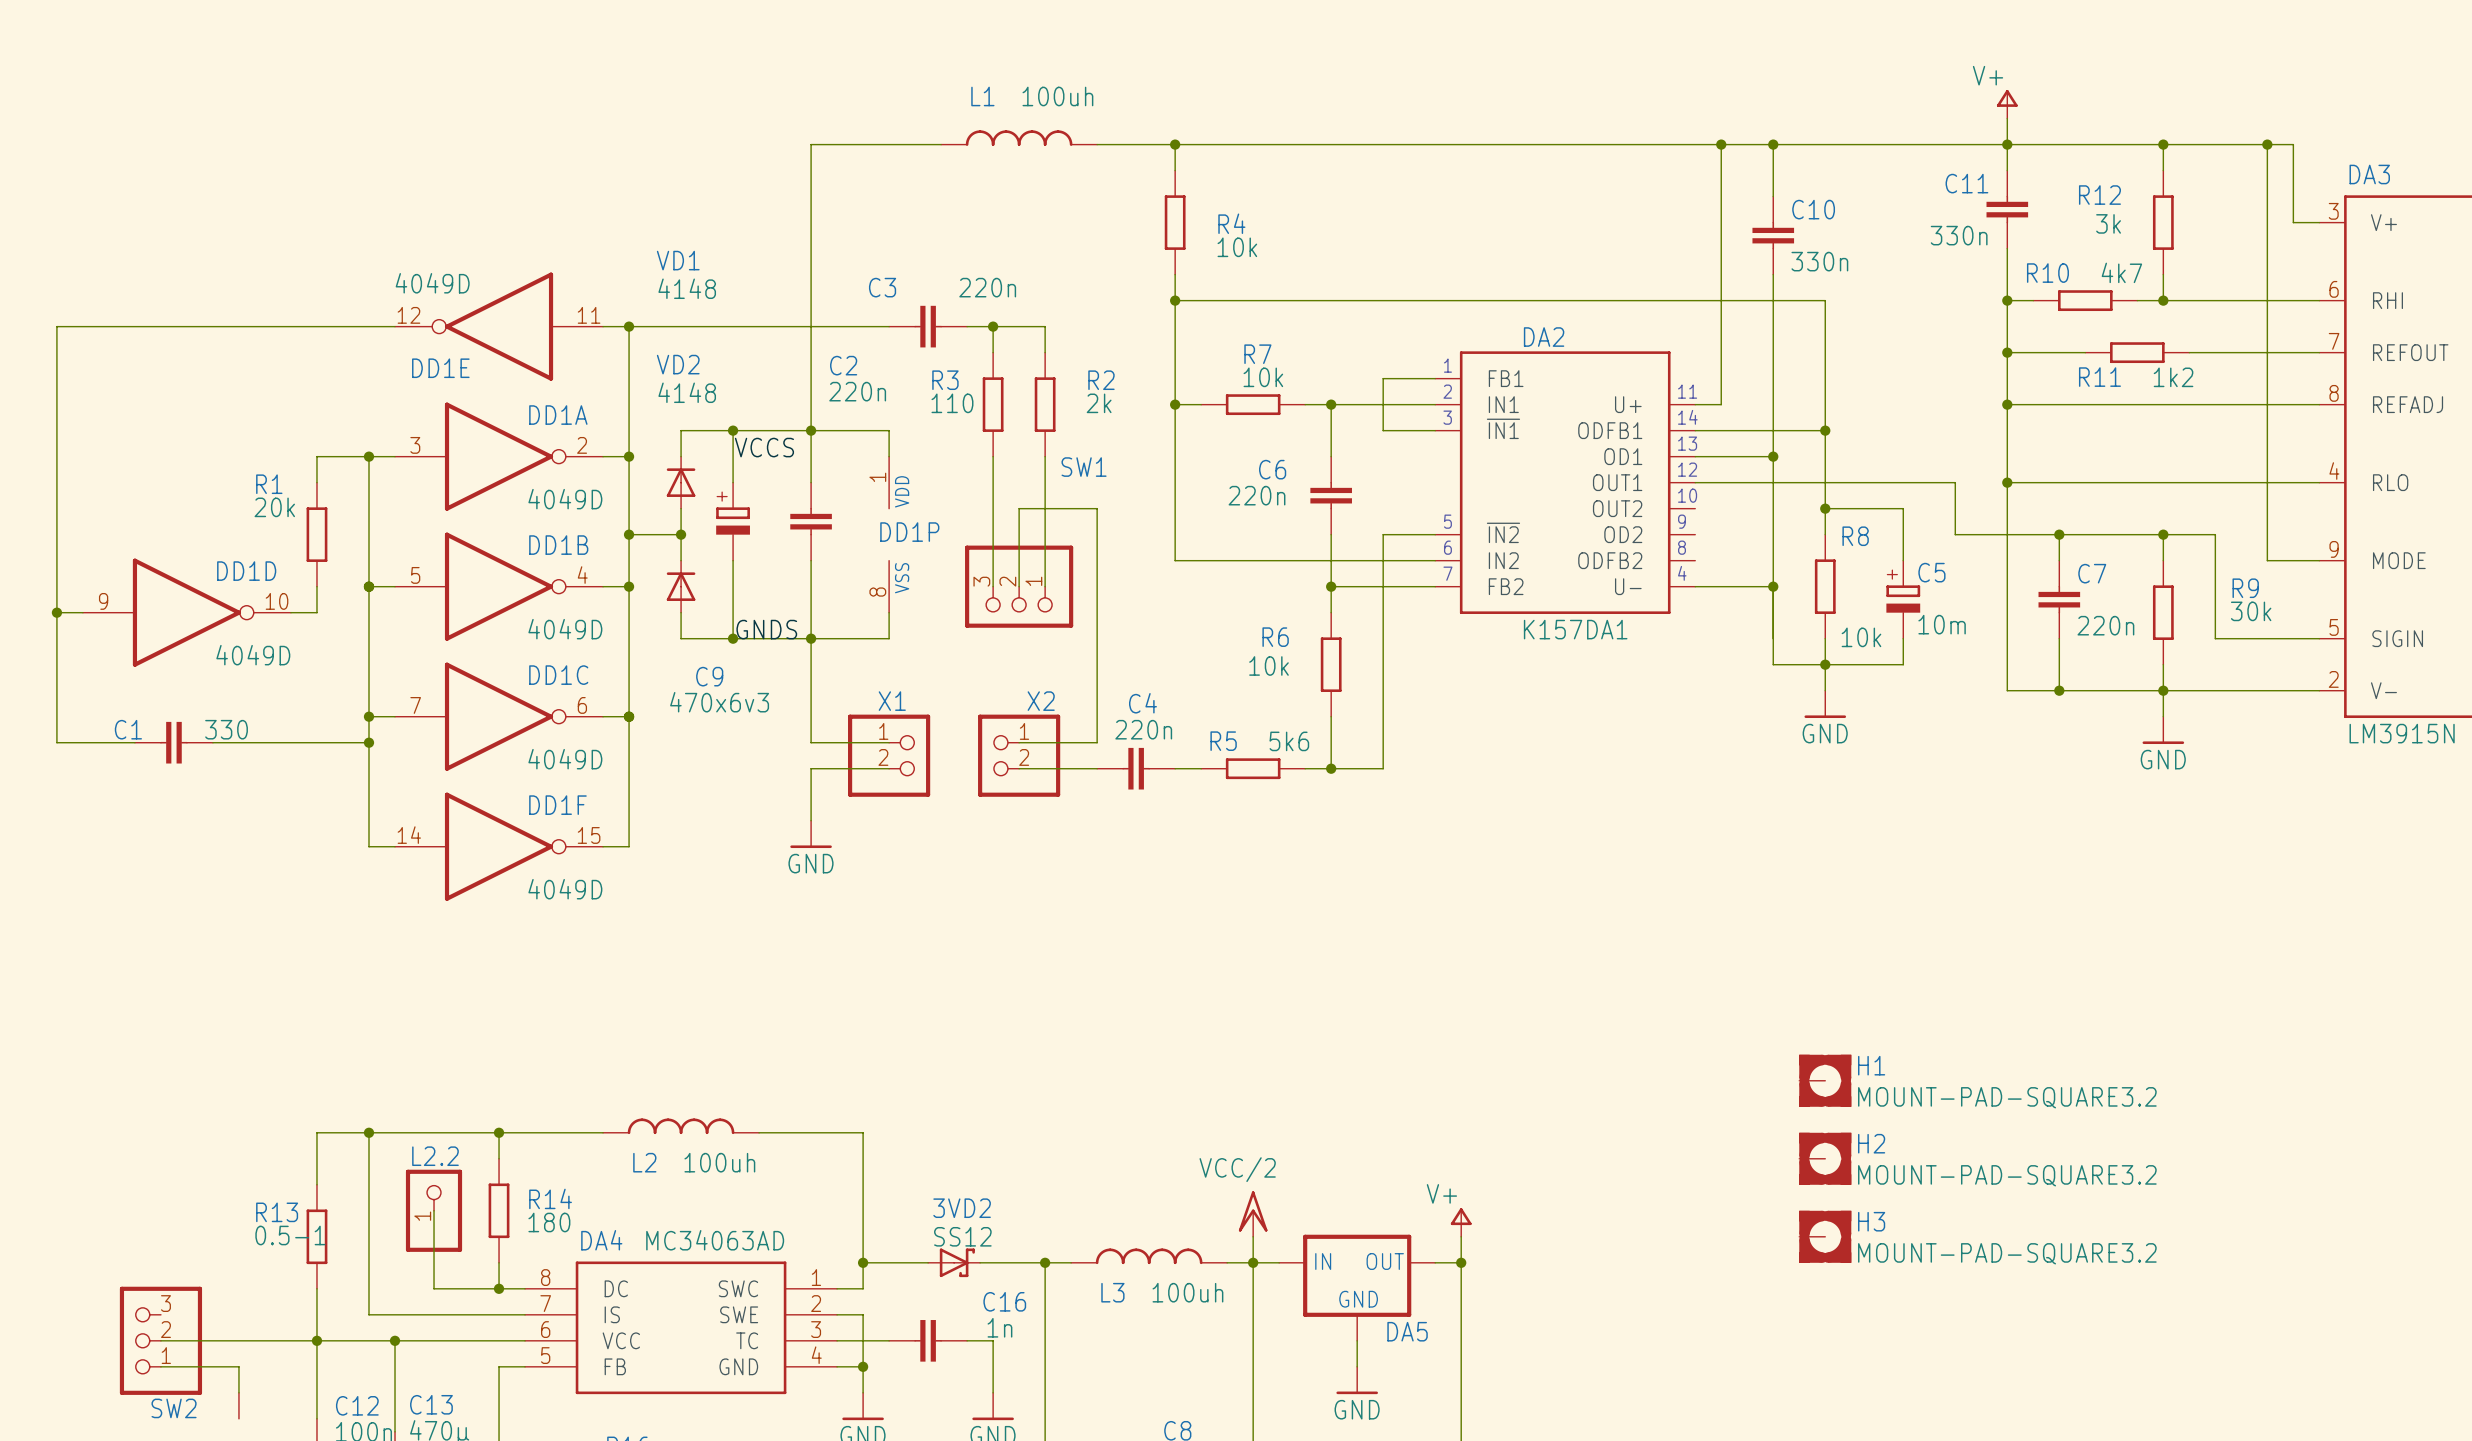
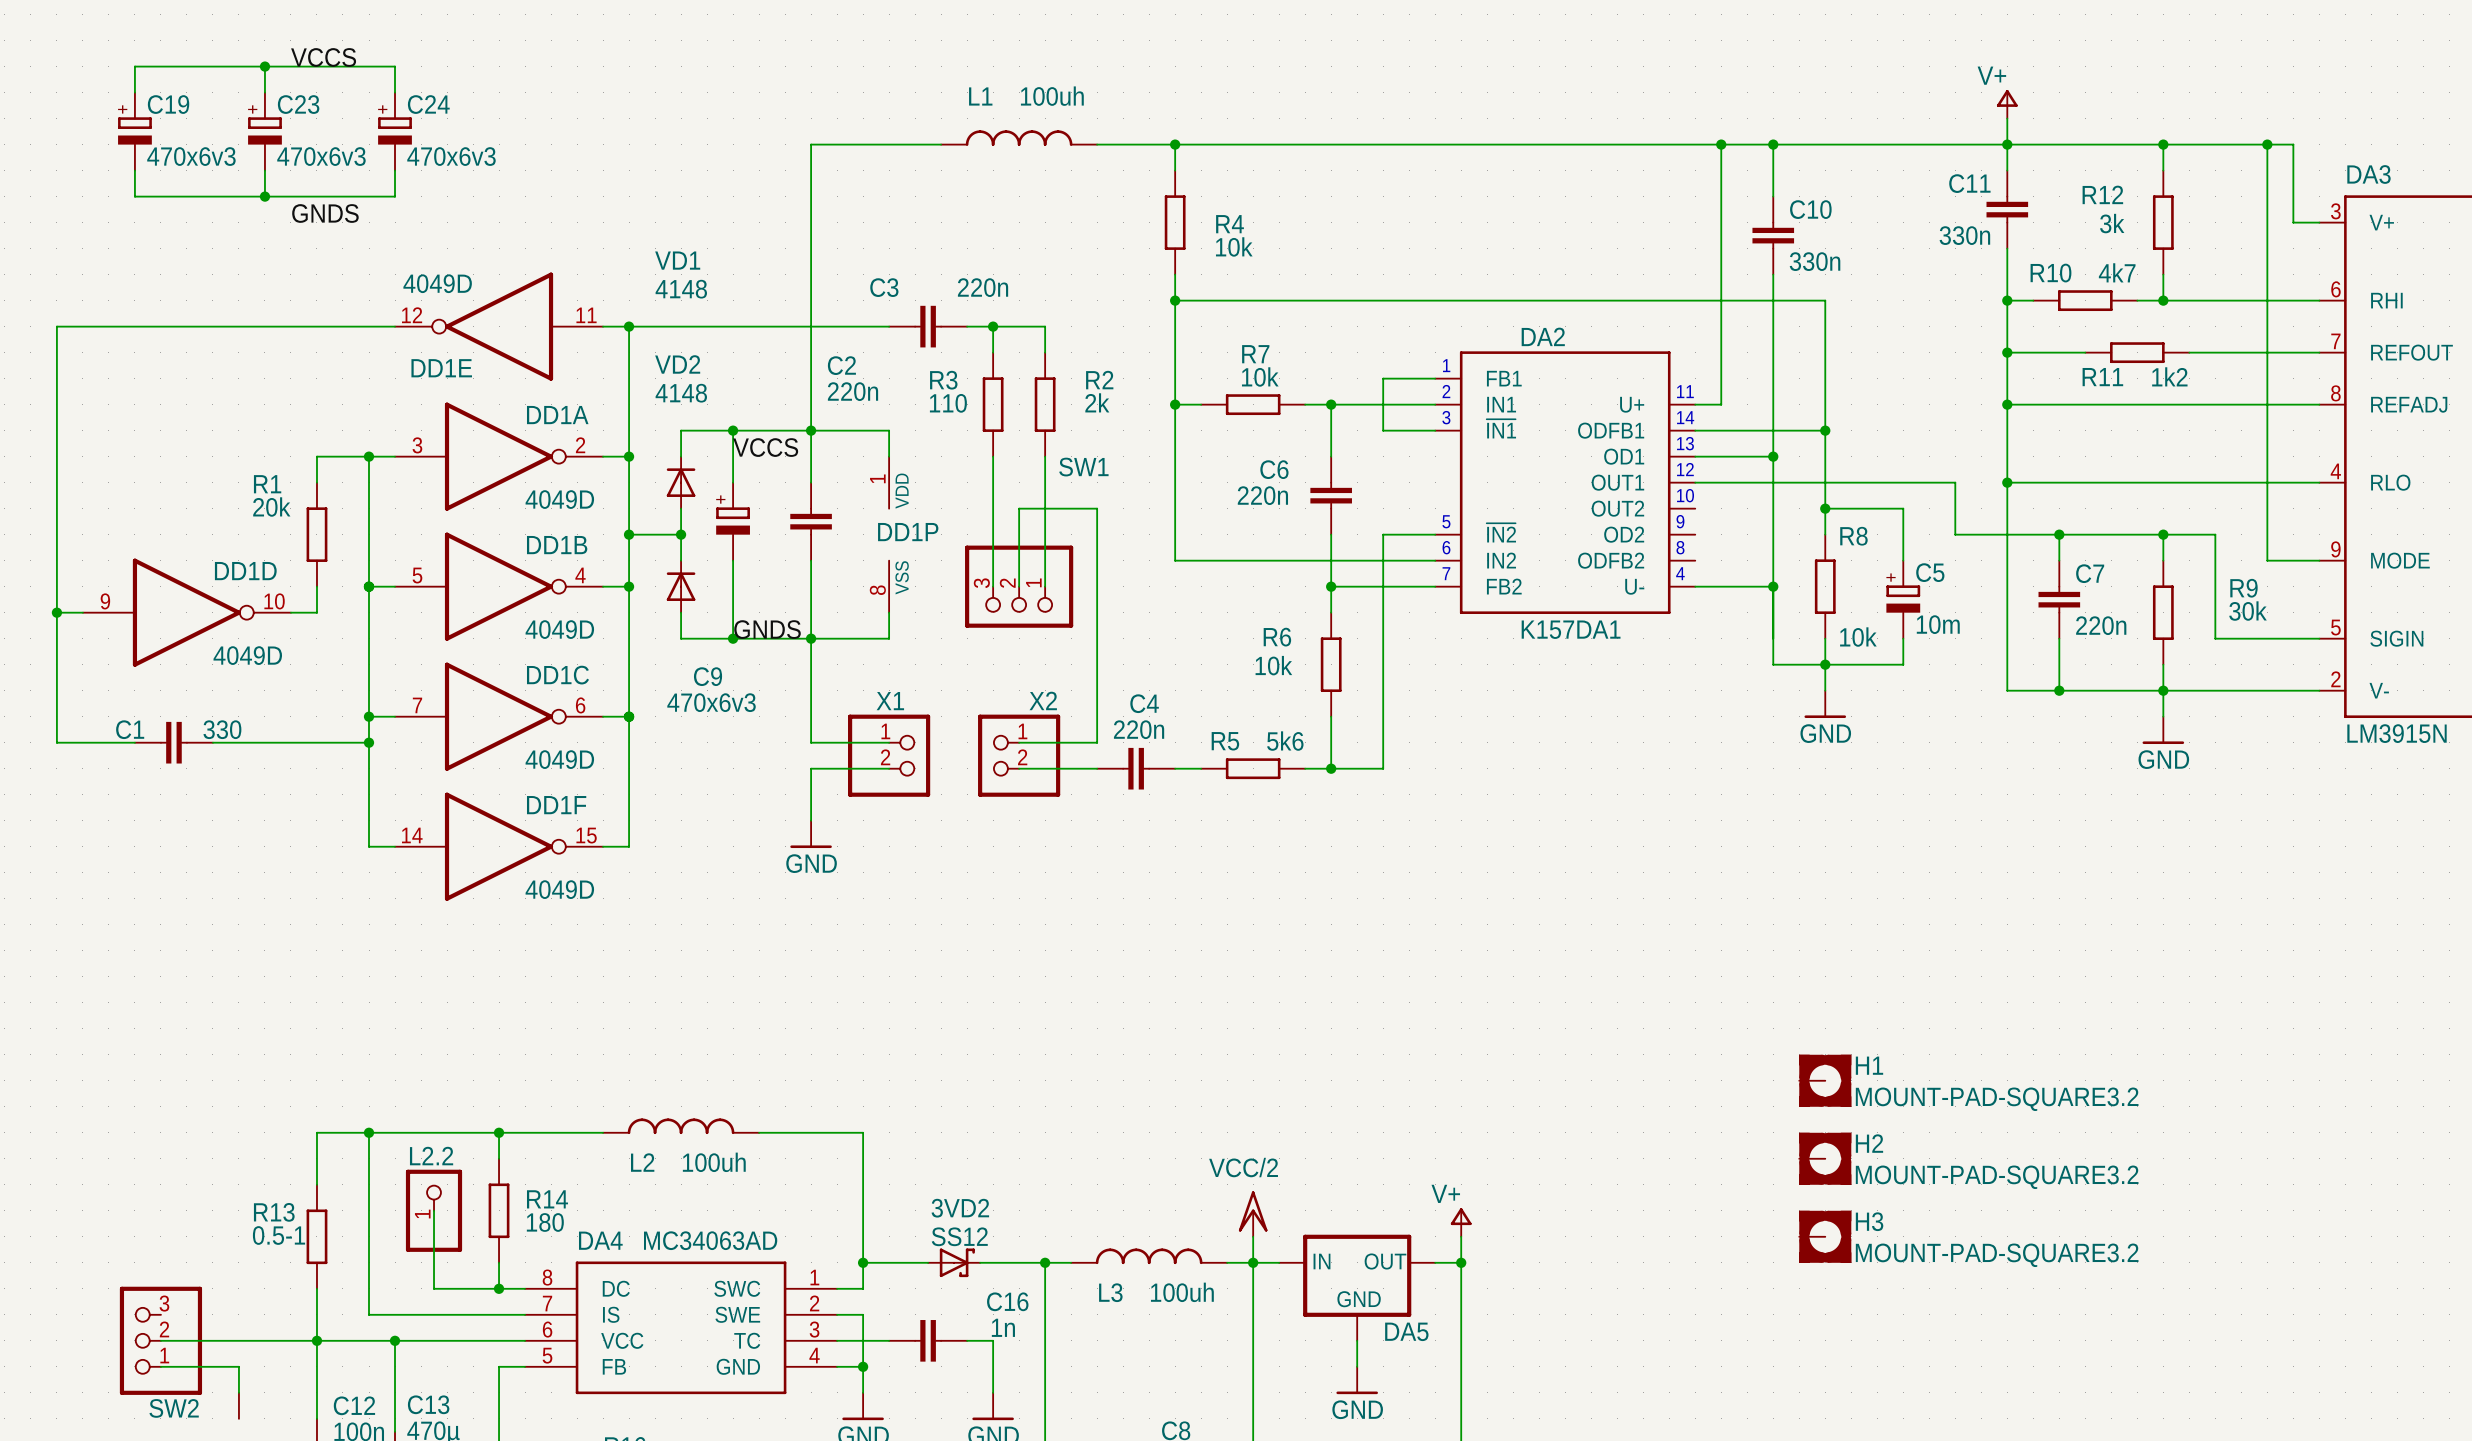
label: none -> VCCS (323, 57)
wire: none -> (264, 66) (264, 92)
junction: none -> (264, 66)
wire: none -> (134, 92) (134, 66) (395, 66) (395, 92)
C19: none -> 470x6v3 (134, 131)
C23: none -> 470x6v3 (264, 131)
C24: none -> 470x6v3 (395, 131)
wire: none -> (134, 170) (134, 196) (395, 196) (395, 170)
wire: none -> (264, 170) (264, 196)
junction: none -> (264, 196)
label: none -> GNDS (325, 213)

